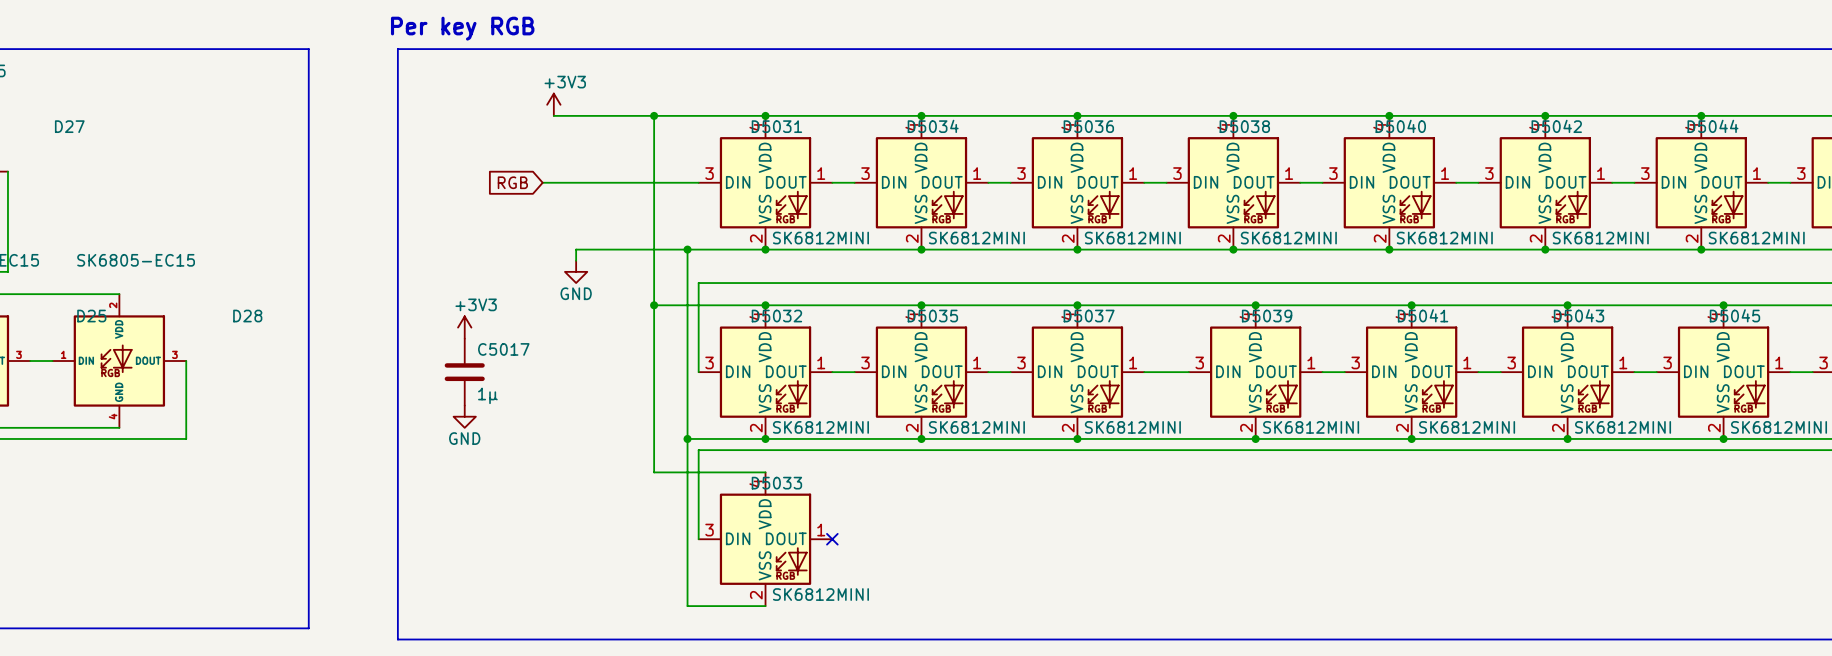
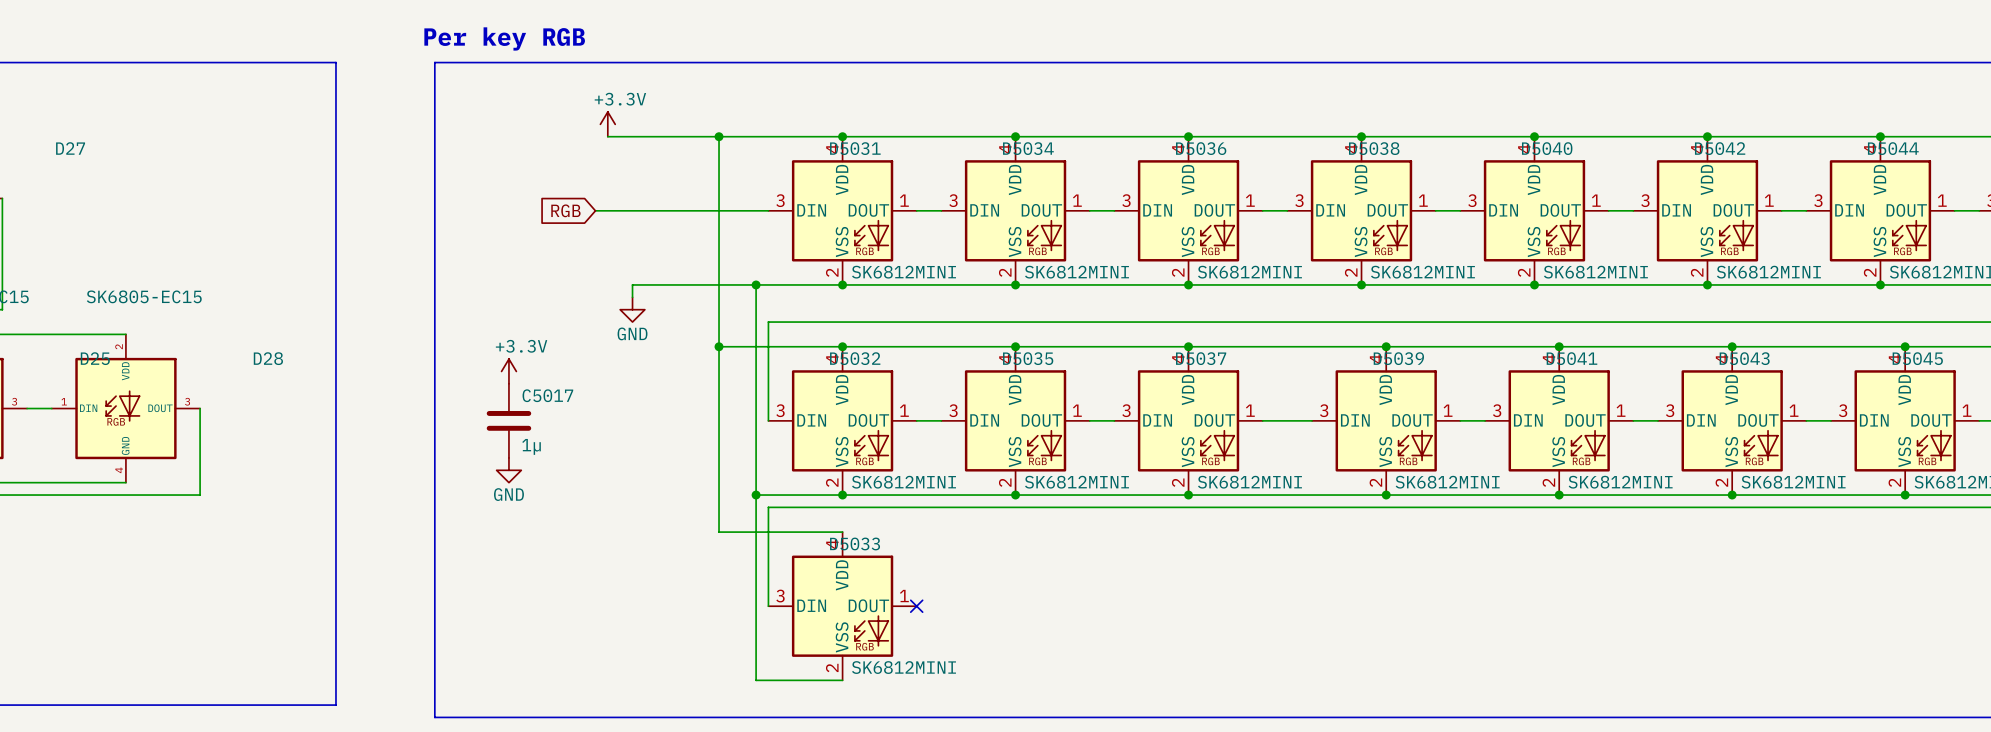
power symbol: +3V3 (553, 104) -> +3.3V (607, 124)
power symbol: +3V3 (464, 327) -> +3.3V (508, 371)

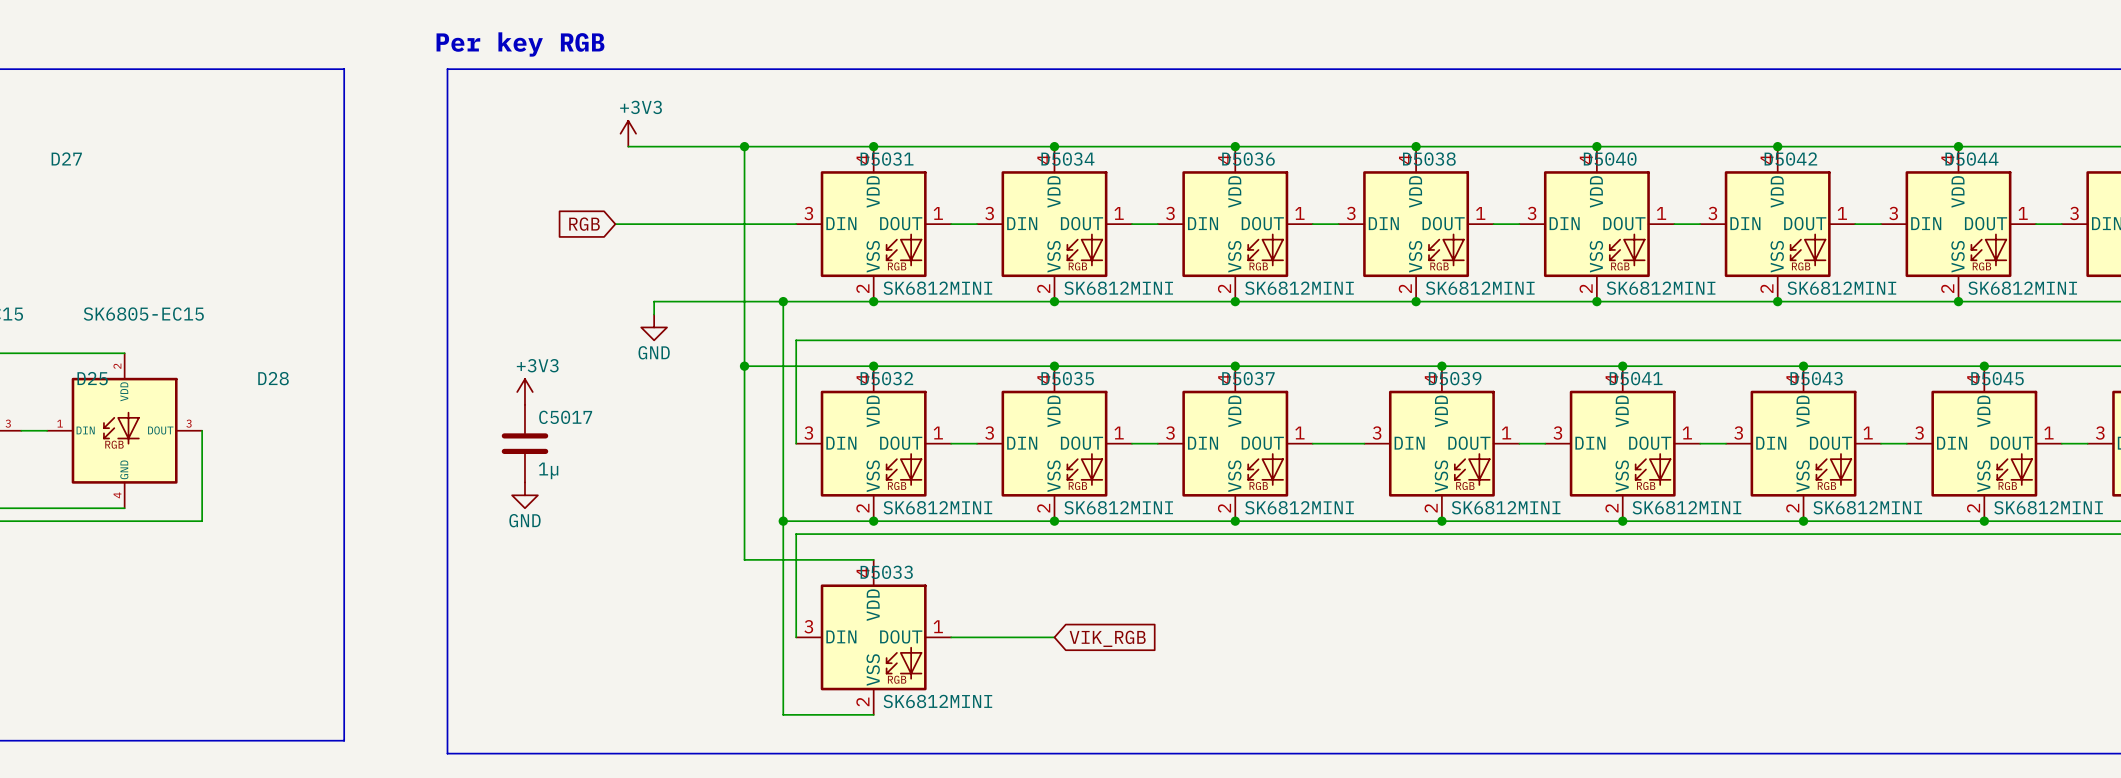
power symbol: +3.3V (607, 124) -> +3V3 (628, 133)
power symbol: +3.3V (508, 371) -> +3V3 (524, 392)
wire: none -> (951, 637) (1054, 637)
no-connect mark: (916, 606) -> none
global label: none -> VIK_RGB (1107, 638)

